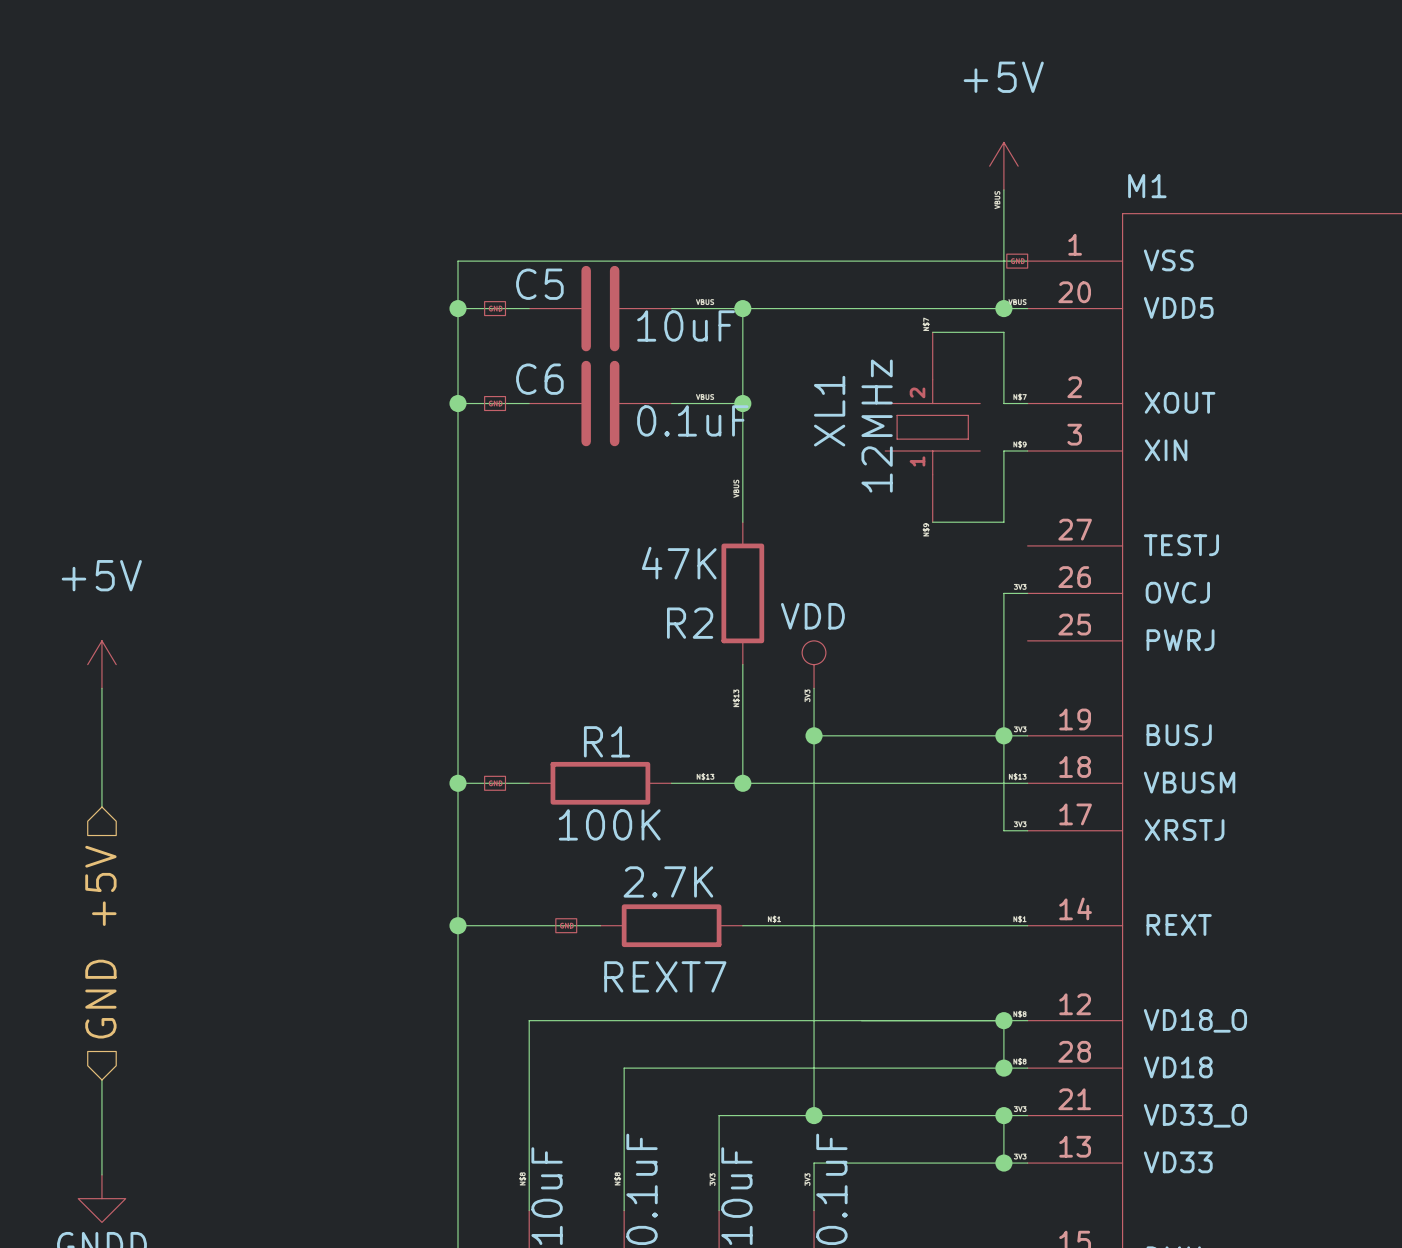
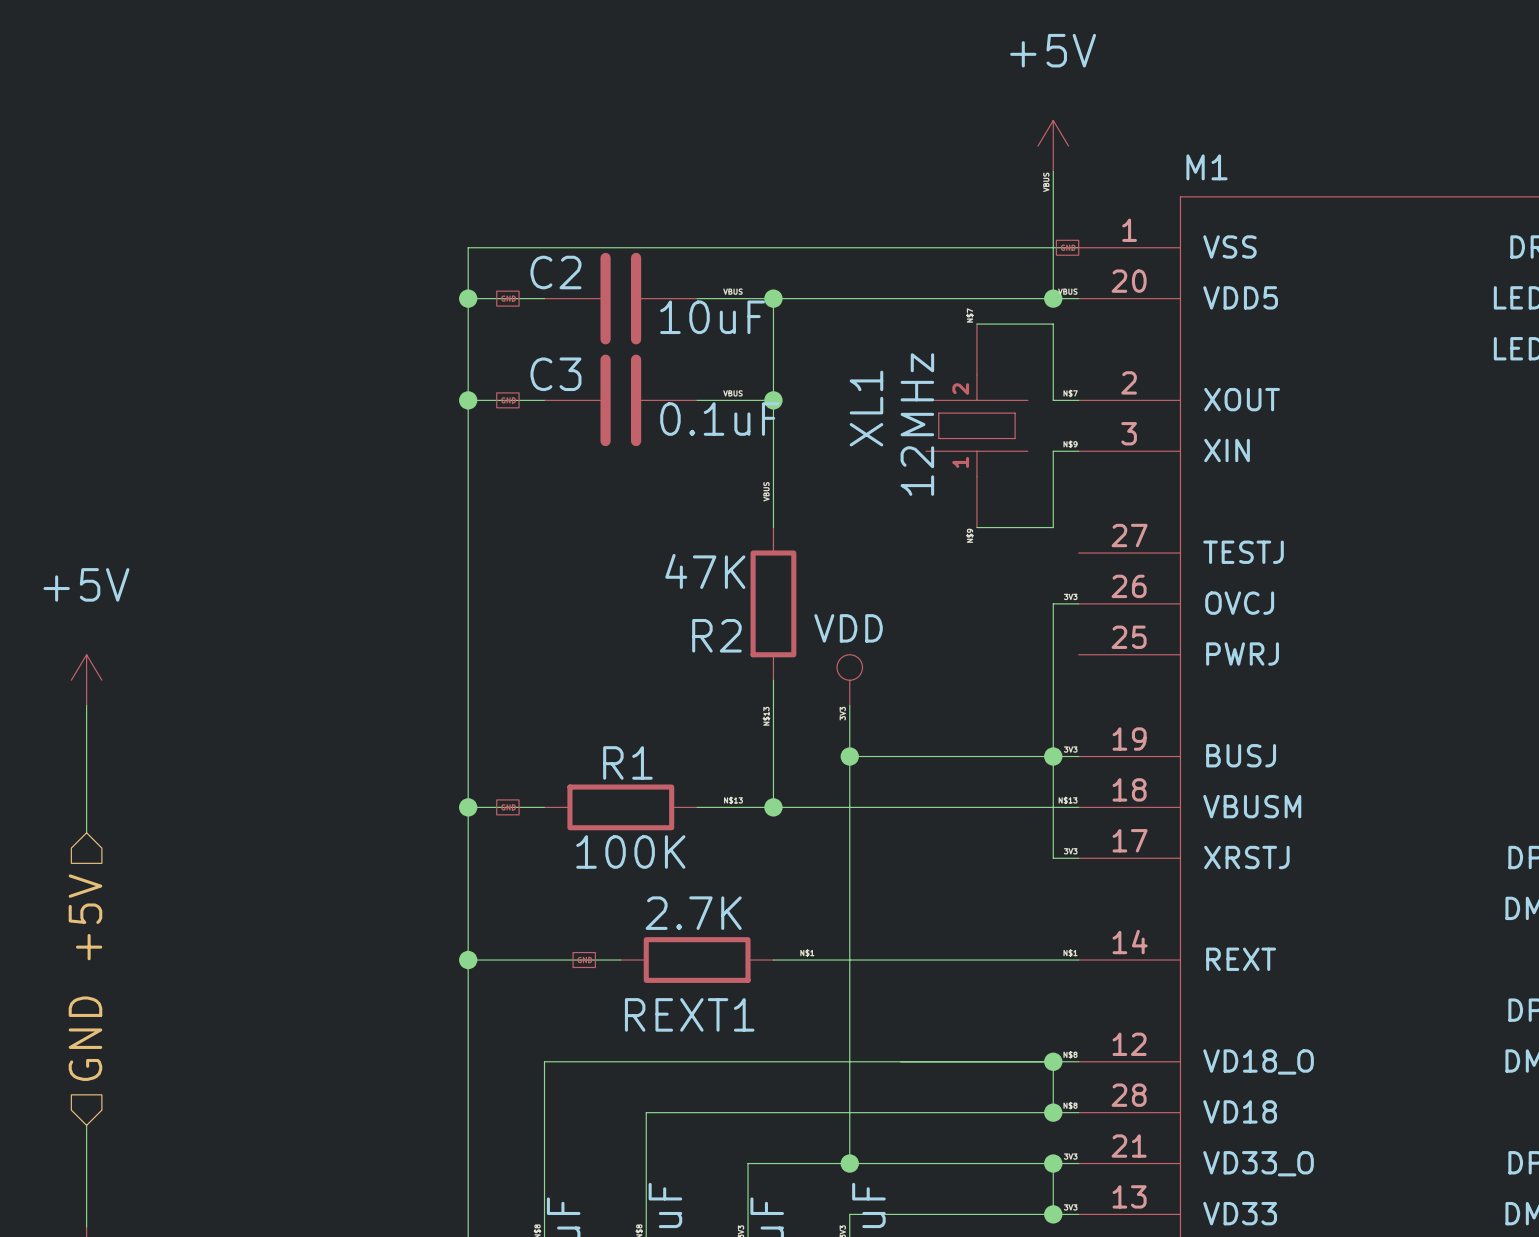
C5 name: C5 (539, 284) -> C2 (555, 272)
C6 name: C6 (539, 379) -> C3 (555, 374)
REXT7 name: REXT7 (665, 976) -> REXT1 (689, 1014)

